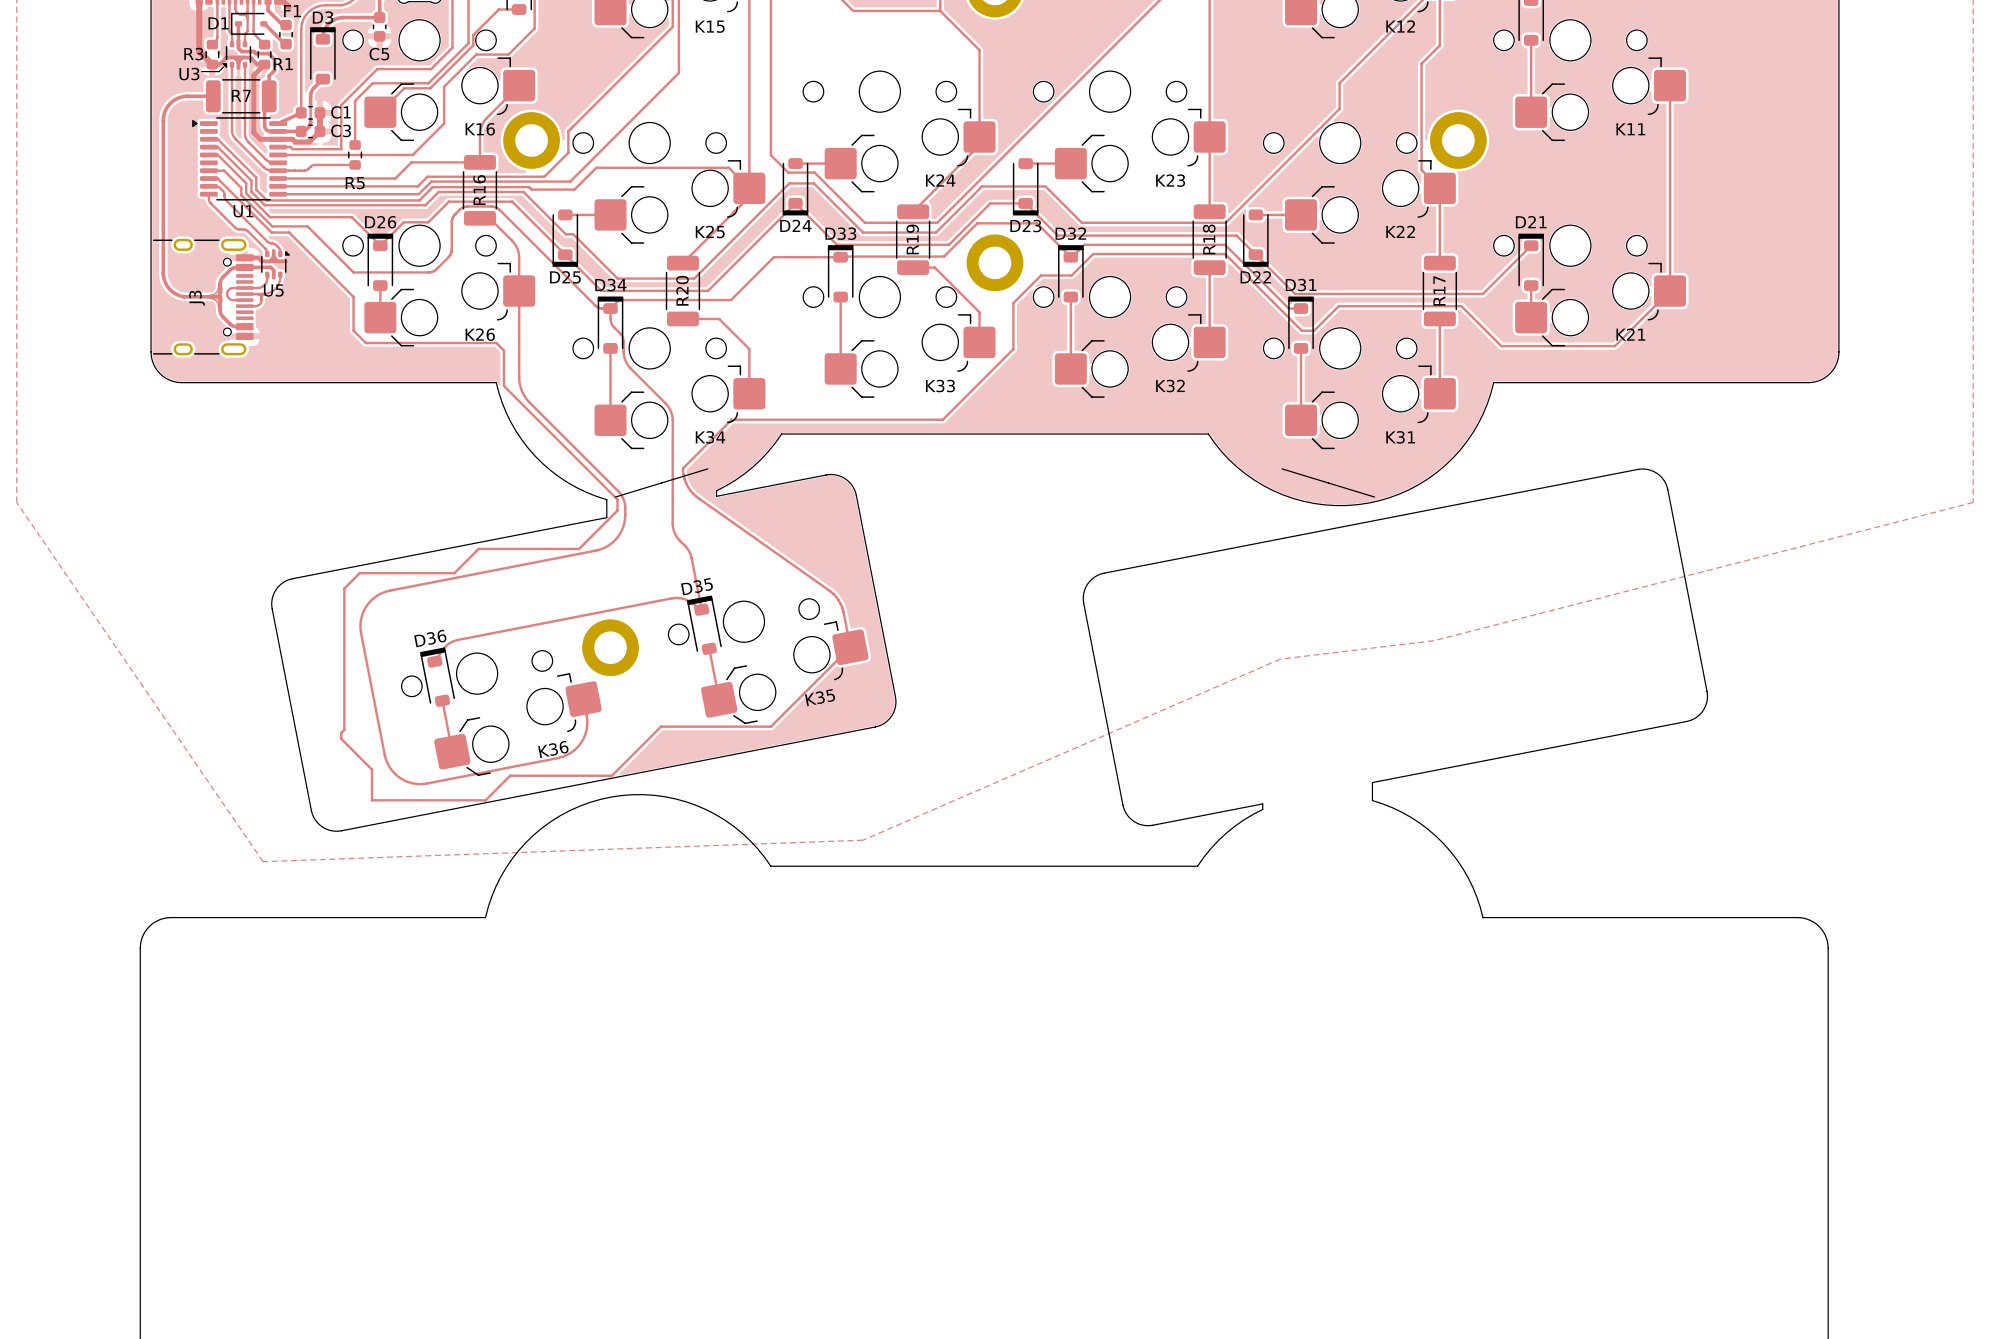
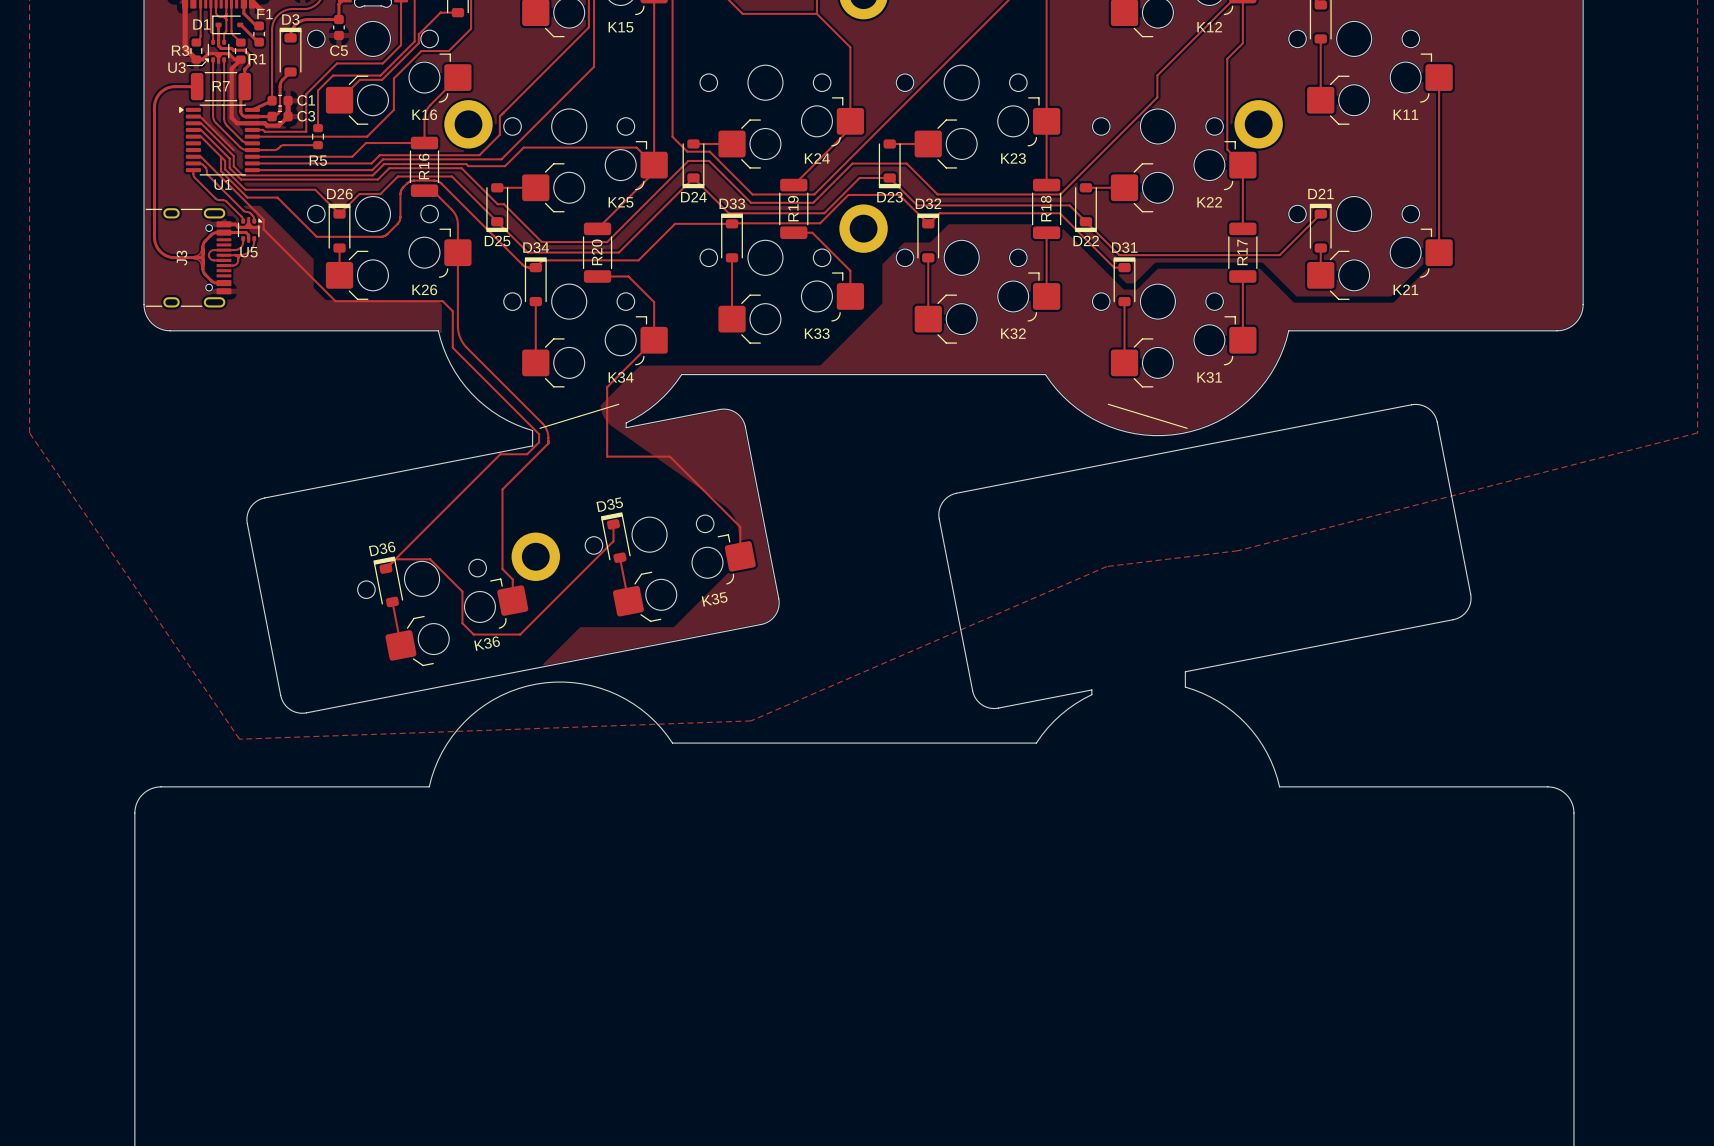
track: none -> (200, 116) (233, 150)
track: (208, 170) (224, 170) (241, 187) -> (221, 156) (221, 164)
track: (271, 232) (289, 232) (353, 296) (353, 330) (365, 343) (496, 343) (501, 347) -> (246, 202) (263, 219) (263, 229) (335, 301) (442, 301)
track: (1670, 291) (1614, 346) (1501, 346) (1461, 306) (1338, 306) (1314, 330) (1301, 330) (1225, 254) (1093, 254) (1071, 275) (1041, 275) (1013, 303) (1013, 349) (942, 419) (731, 419) (682, 468) (686, 483) (696, 496) (830, 591) (842, 607) (850, 647) (770, 726) (661, 726) (611, 775) (510, 775) (485, 800) (371, 800) (371, 769) (341, 738) (341, 732) (344, 729) (344, 588) (359, 573) (454, 573) (478, 548) (579, 548) (617, 510) (617, 499) (503, 385) (503, 350) -> none
track: (610, 308) (611, 323) (623, 338) (626, 362) (665, 403) (671, 414) (673, 528) (676, 536) (691, 556) (701, 609) (684, 599) (672, 598) (455, 640) (445, 646) (434, 661) -> (444, 303) (452, 311) (452, 347) (539, 434) (539, 442) (527, 454) (500, 454) (385, 568)
track: none -> (654, 340) (607, 387) (607, 456) (669, 456) (740, 526) (740, 556)
track: (625, 515) (619, 534) (603, 548) (385, 591) (369, 602) (361, 619) (361, 633) (385, 759) (392, 771) (408, 782) (427, 783) (567, 755) (578, 746) (585, 734) (587, 720) (583, 699) -> (548, 443) (502, 489) (502, 569) (512, 579) (512, 600)
track: none -> (613, 524) (613, 541) (520, 634) (473, 634) (462, 623) (462, 591) (430, 559) (395, 559)

